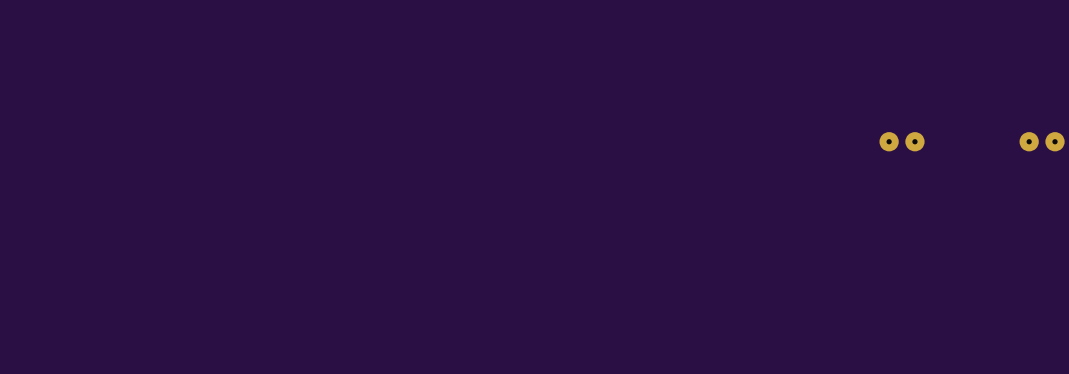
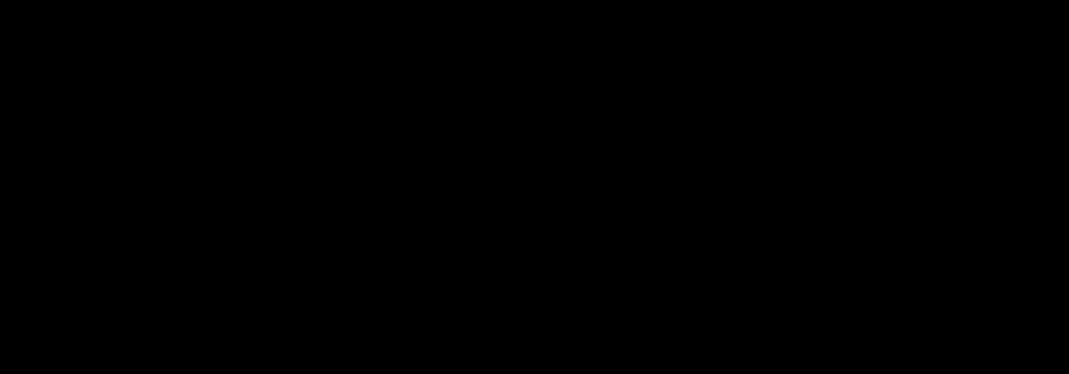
via: (889, 141) -> none
via: (914, 141) -> none
via: (1029, 141) -> none
via: (1055, 141) -> none

